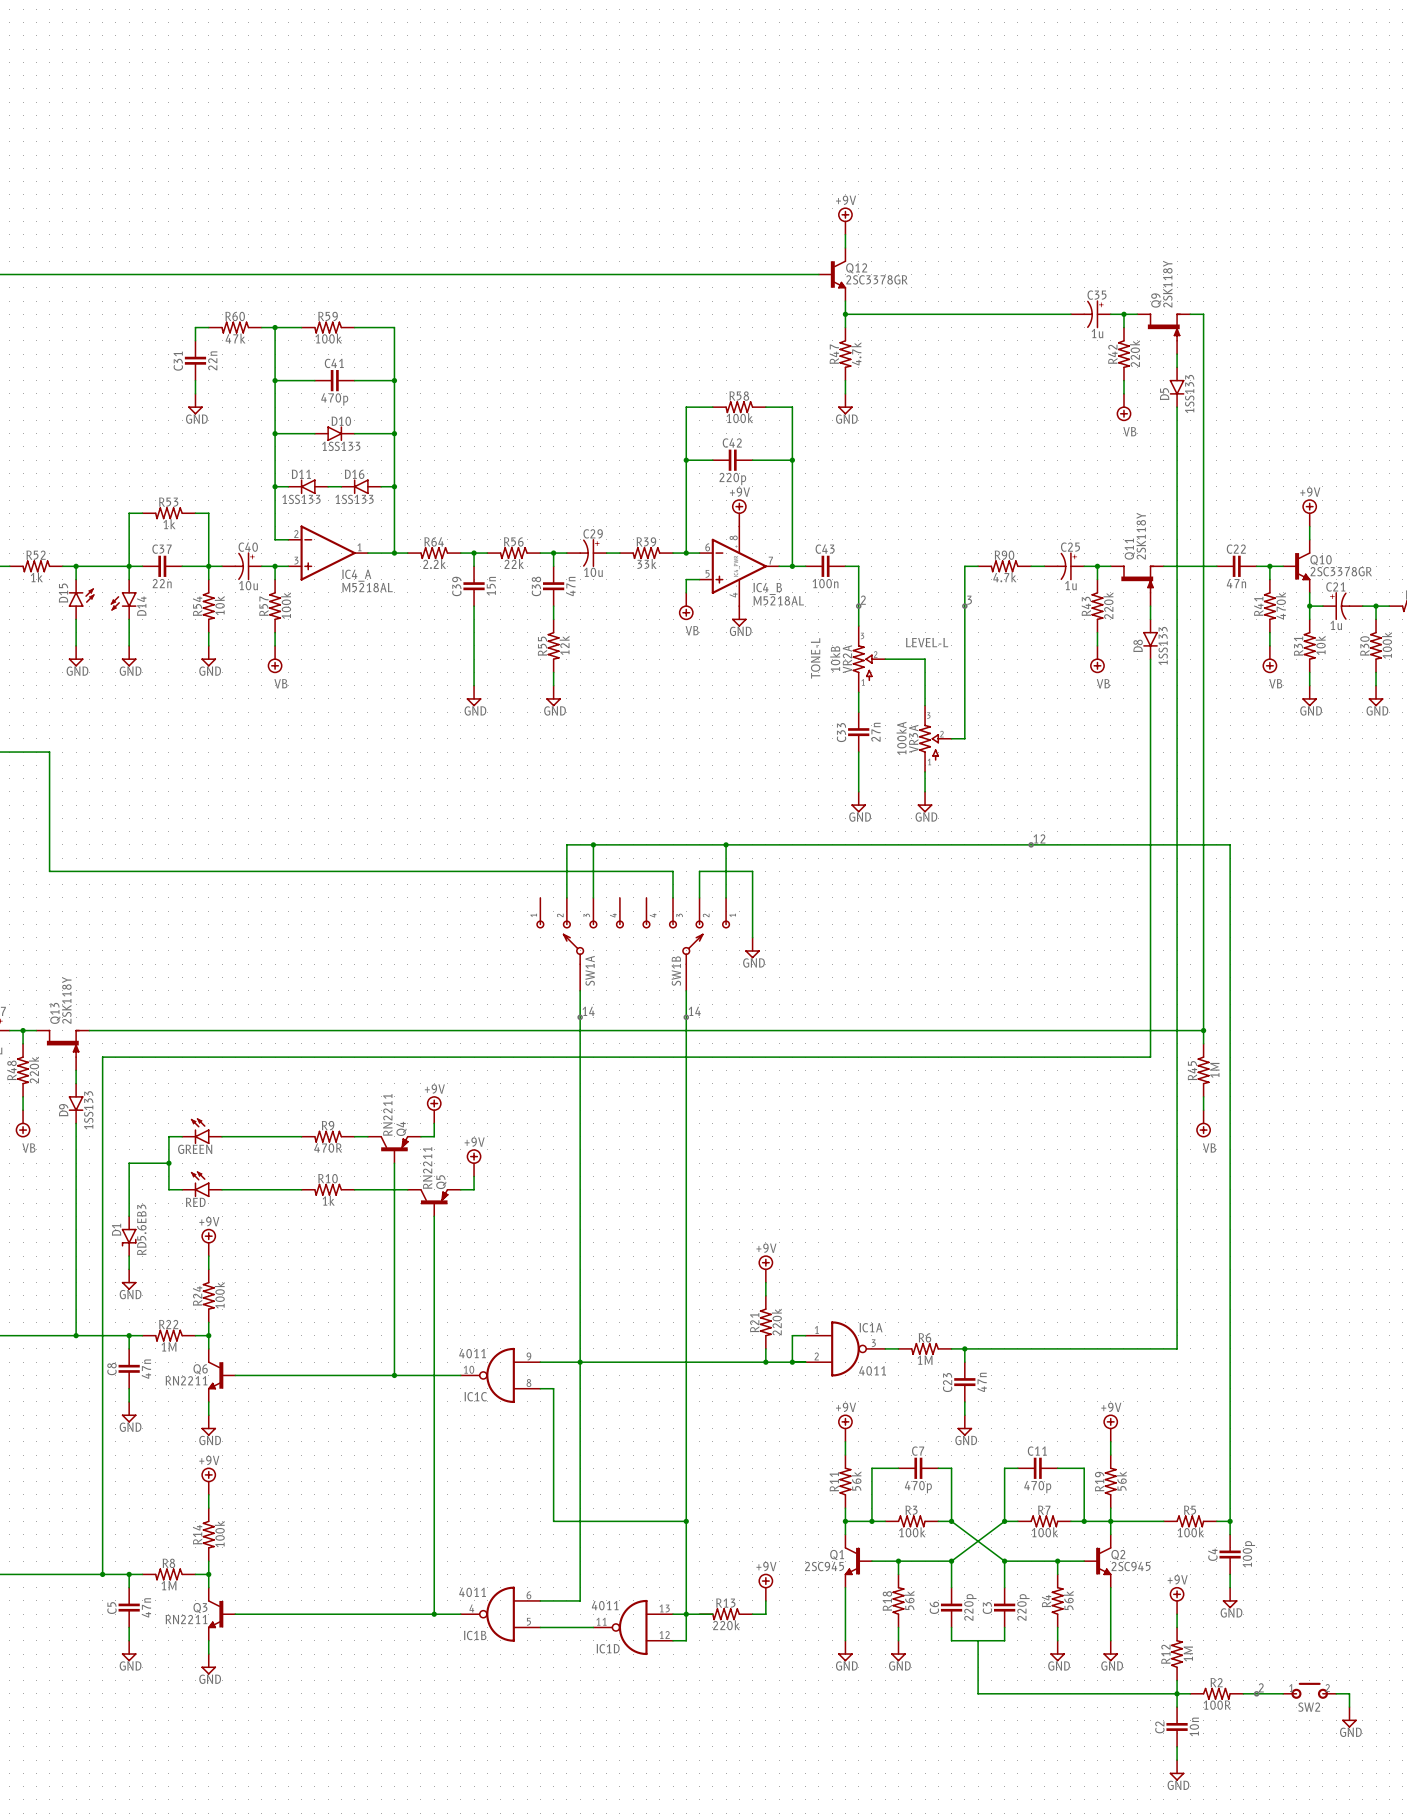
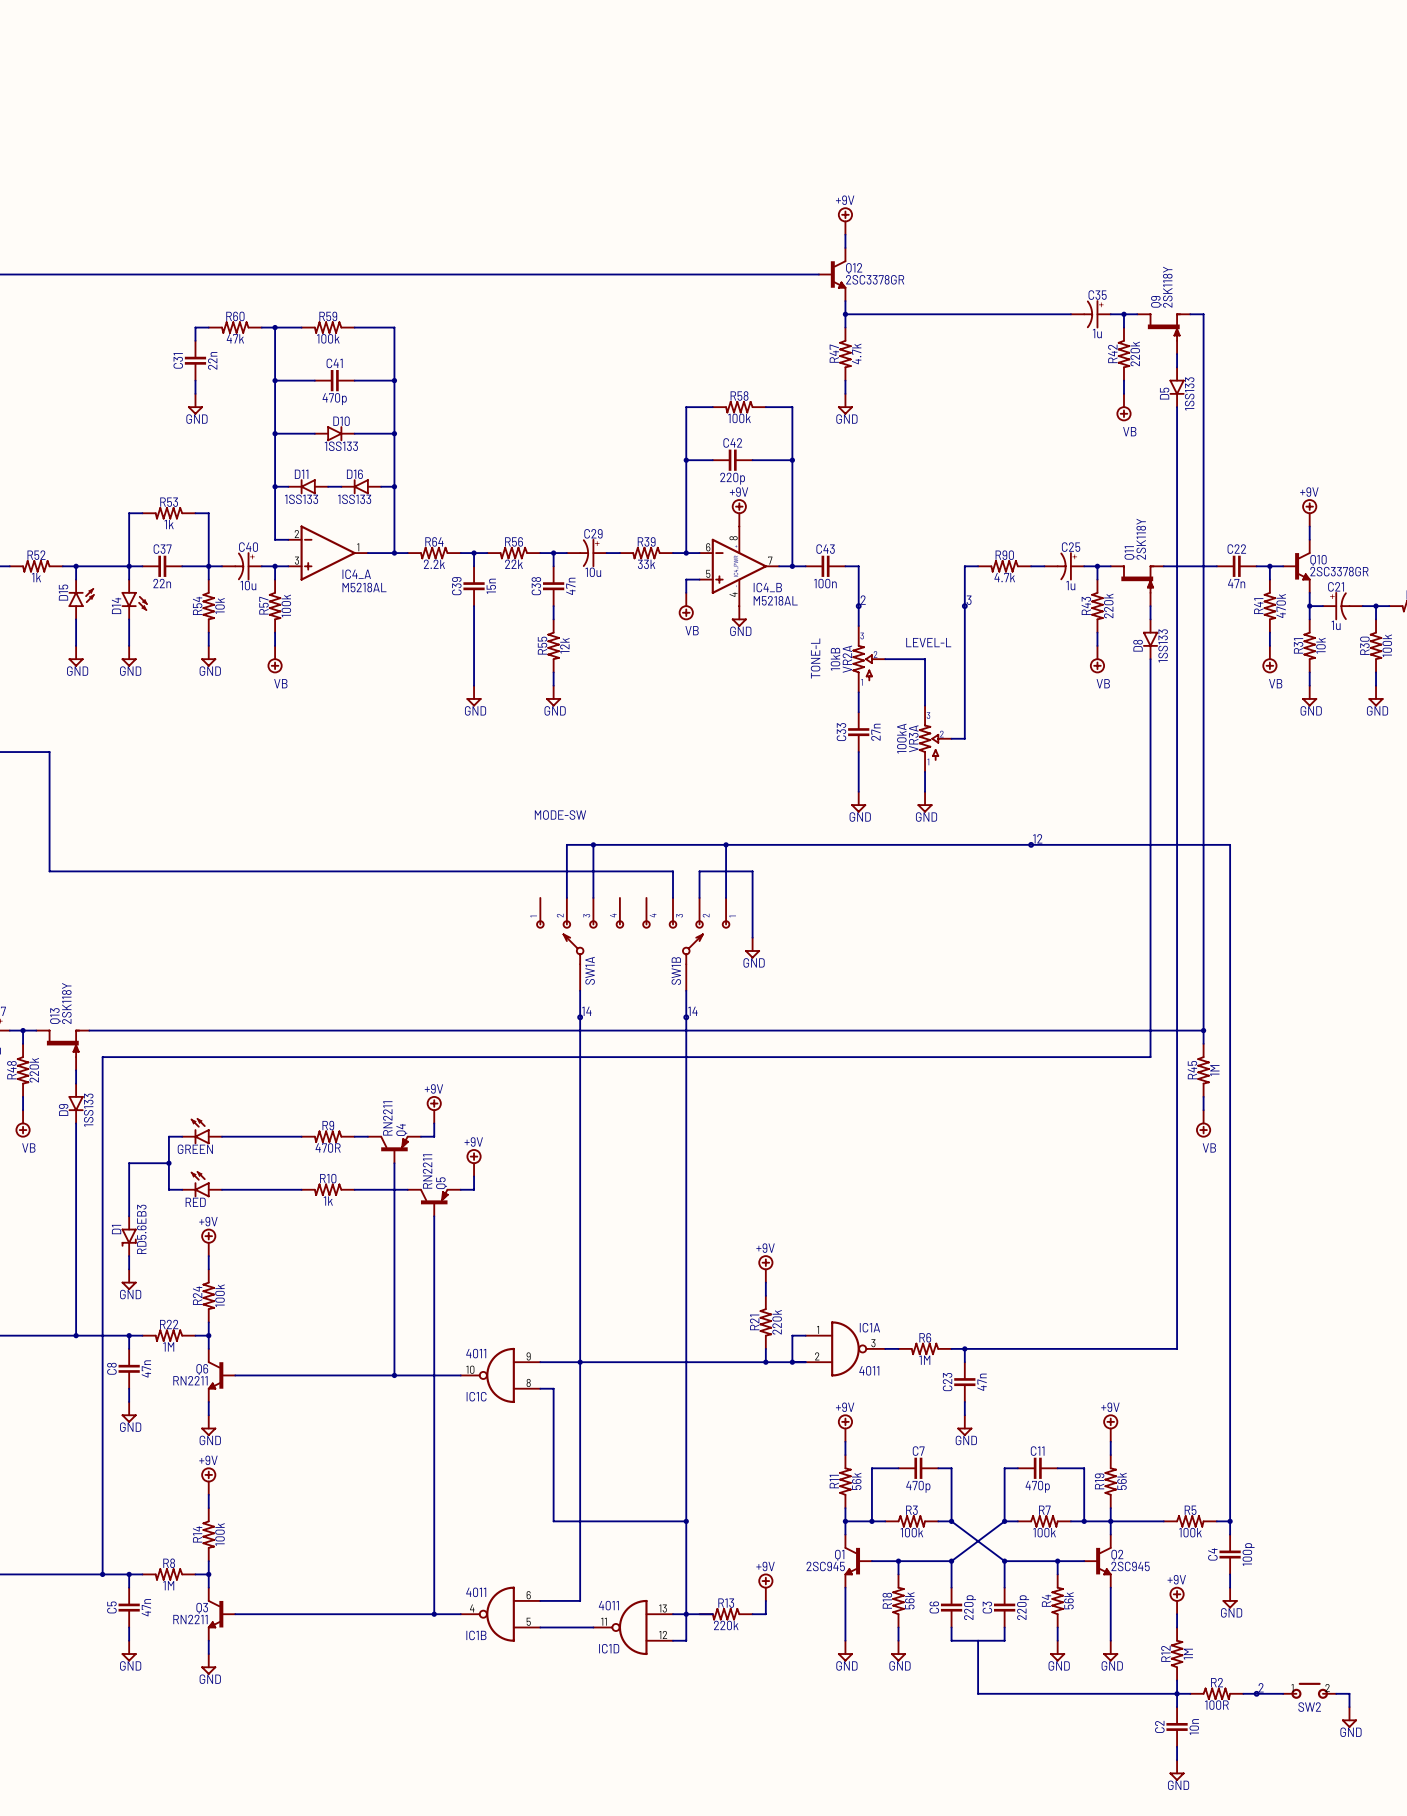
D14 flip: as is (123, 601) -> left-right (134, 601)
text: none -> MODE-SW (560, 815)

